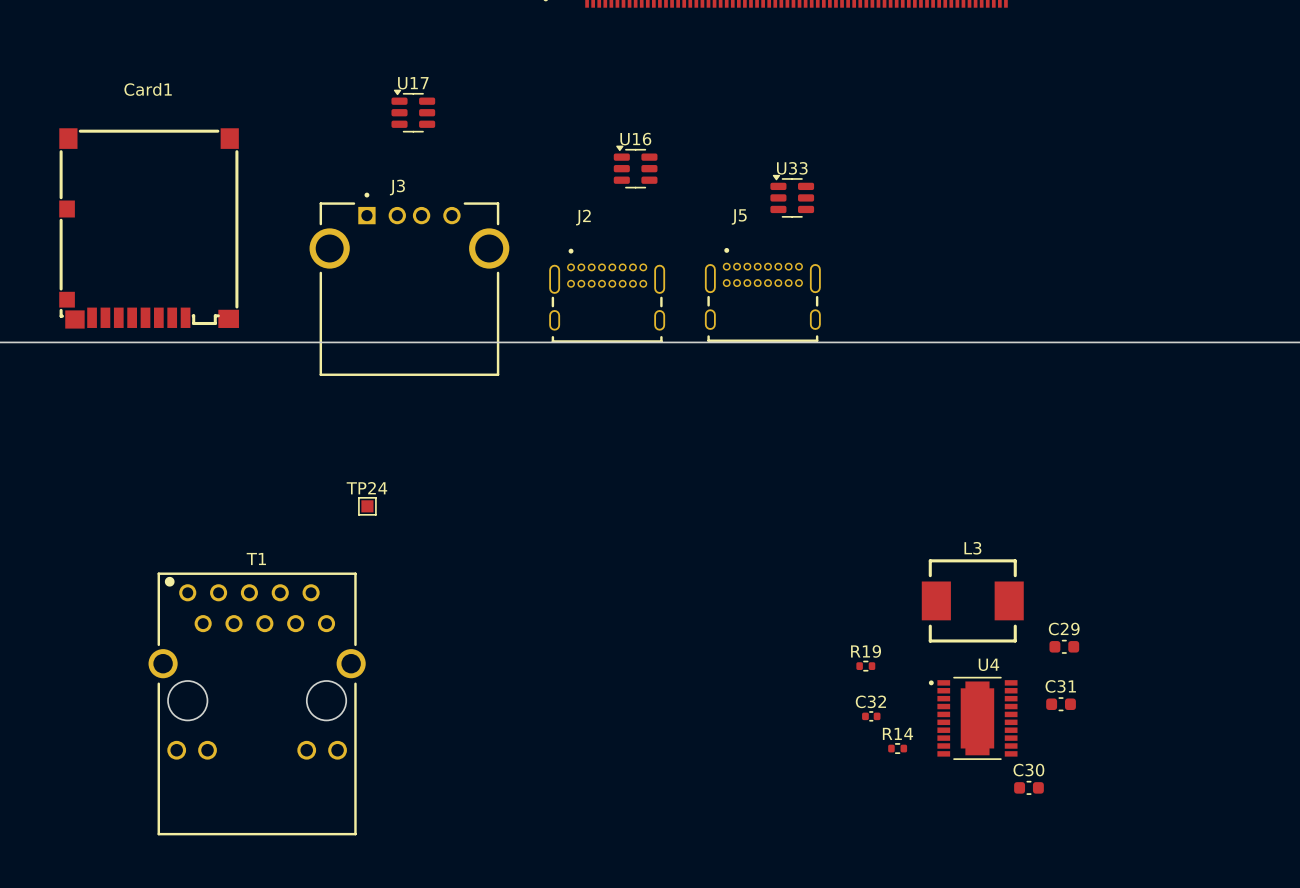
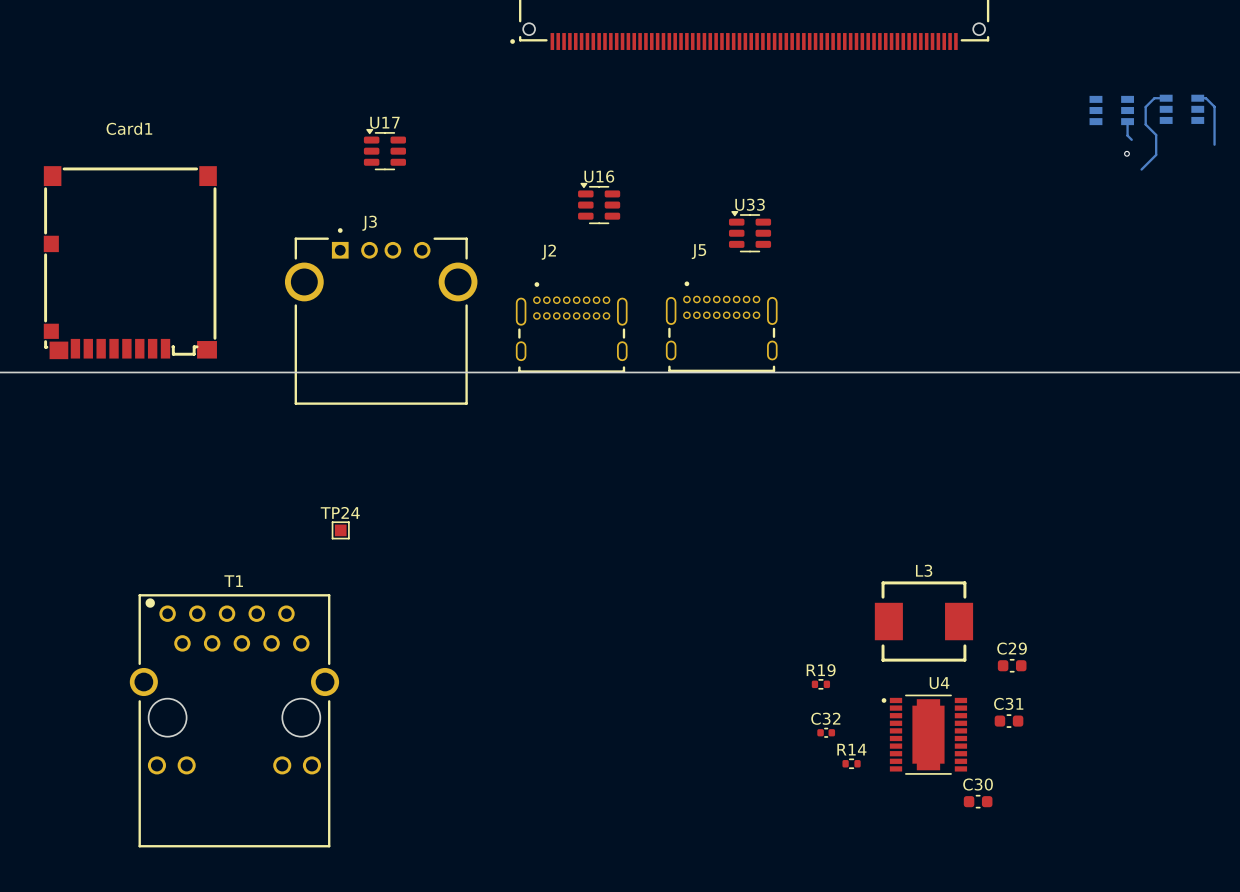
bottom track: none -> (1166, 98) (1154, 98) (1145, 106) (1145, 124) (1156, 135) (1156, 154) (1141, 169)
bottom track: none -> (1197, 98) (1205, 98) (1214, 106) (1214, 144)
part: none -> (1181, 109)
part: none -> (1111, 110)
bottom track: none -> (1127, 121) (1127, 135) (1131, 139)
via: none -> (1126, 153)

